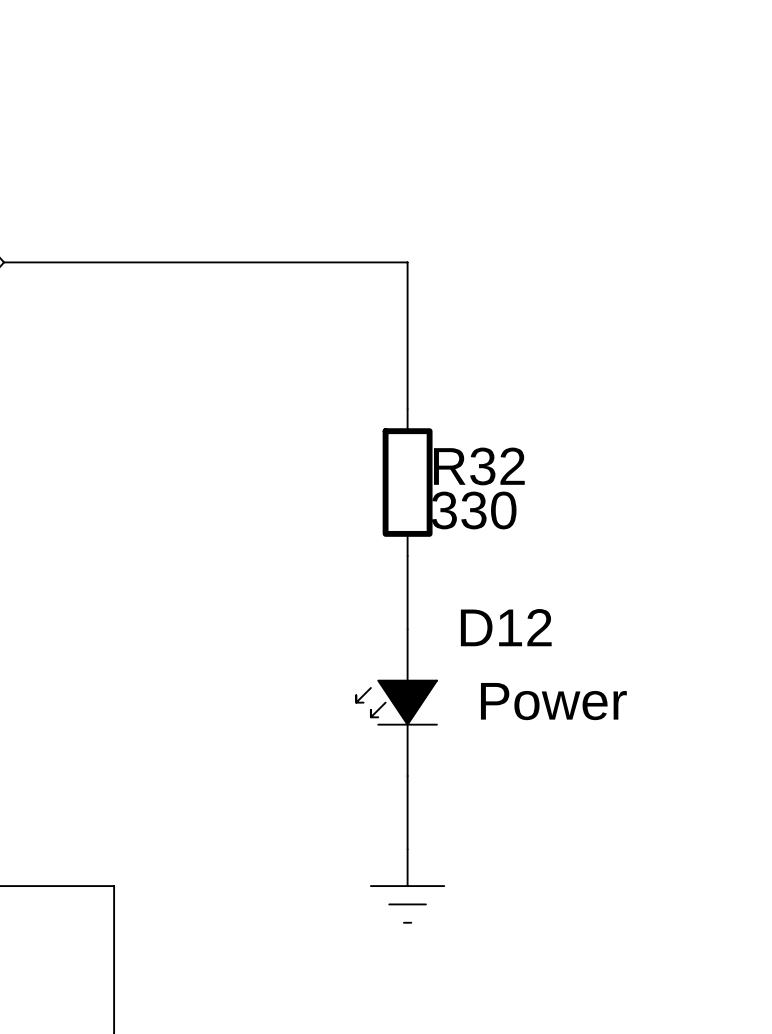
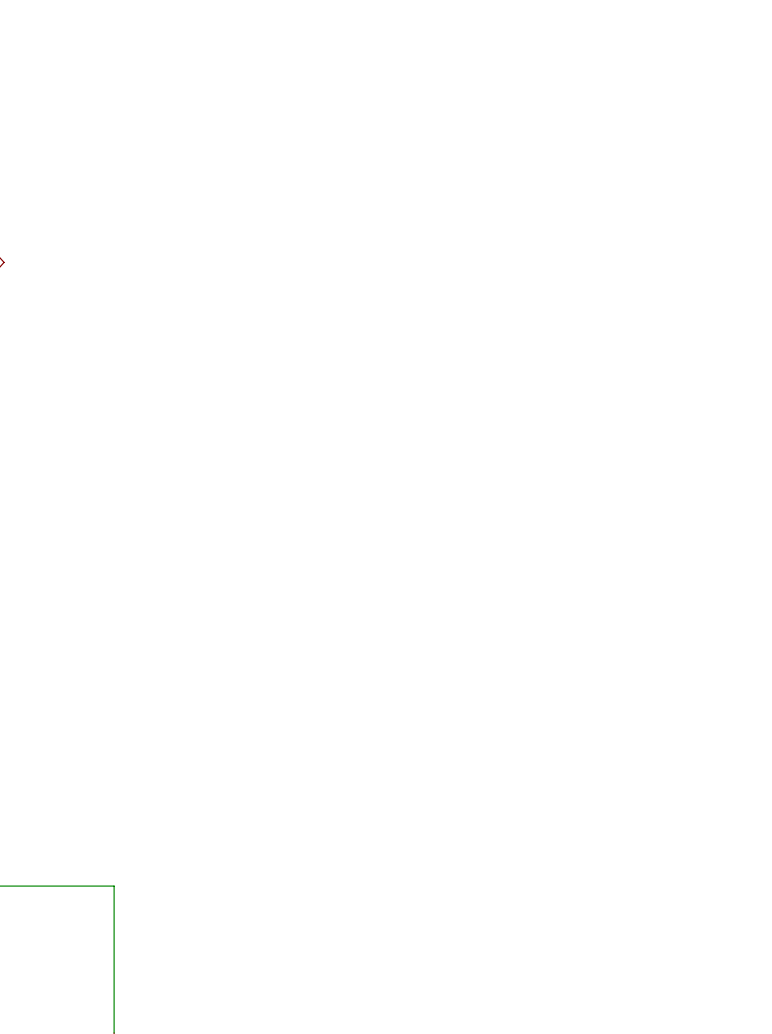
wire: (4, 262) (407, 262) (407, 409) -> none
R32: 330 (407, 482) -> none
wire: (407, 555) (407, 629) -> none
D12: Power (396, 702) -> none
wire: (407, 776) (407, 849) -> none
power symbol: (407, 886) -> none

